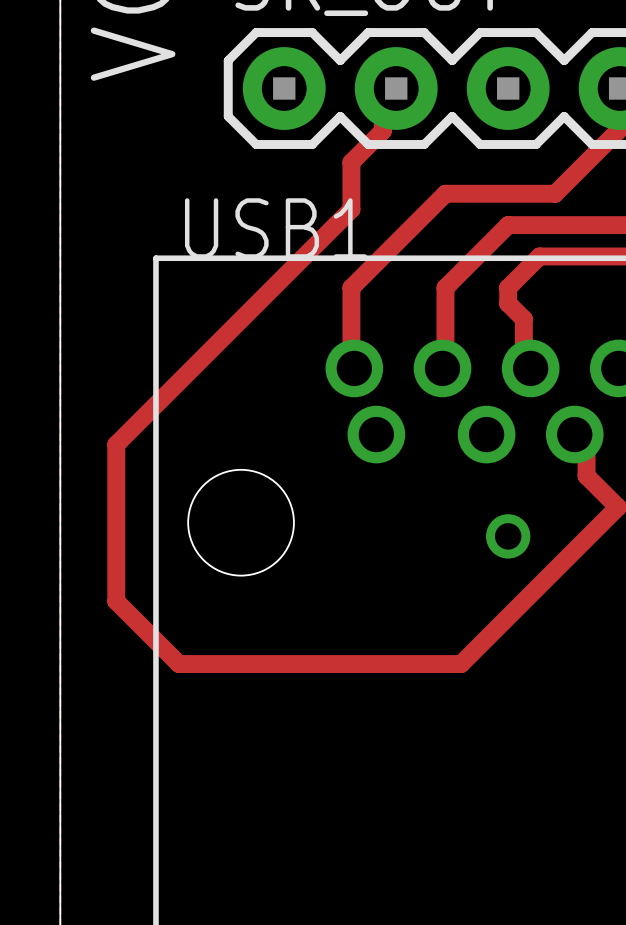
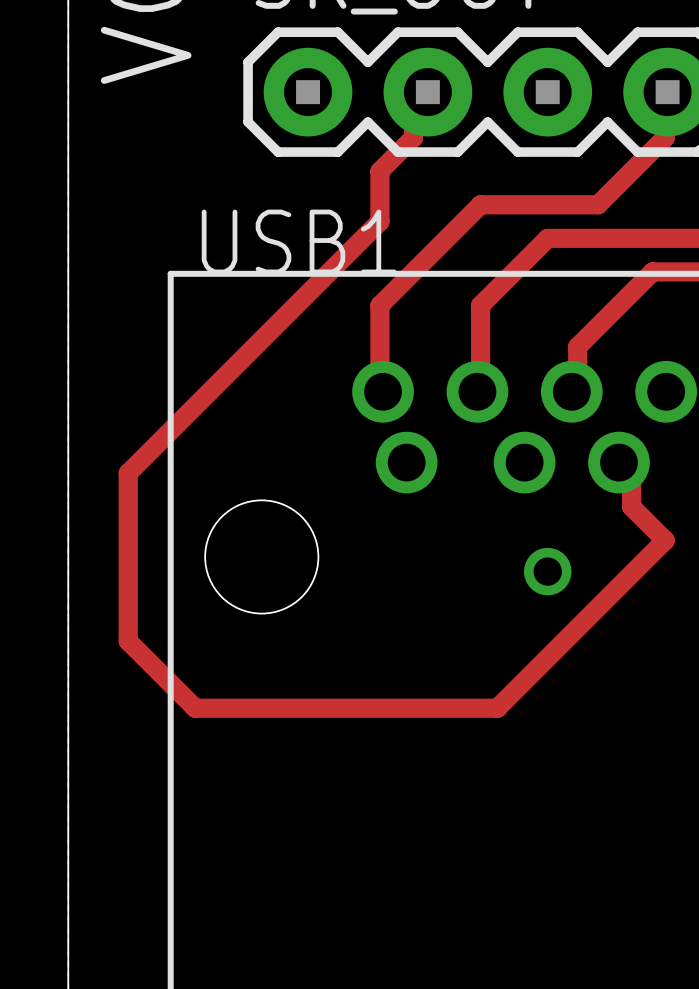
track: (606, 256) (539, 256) (508, 287) (508, 303) (523, 319) (523, 366) (530, 368) -> (652, 271) (577, 346) (577, 391) (571, 391)

